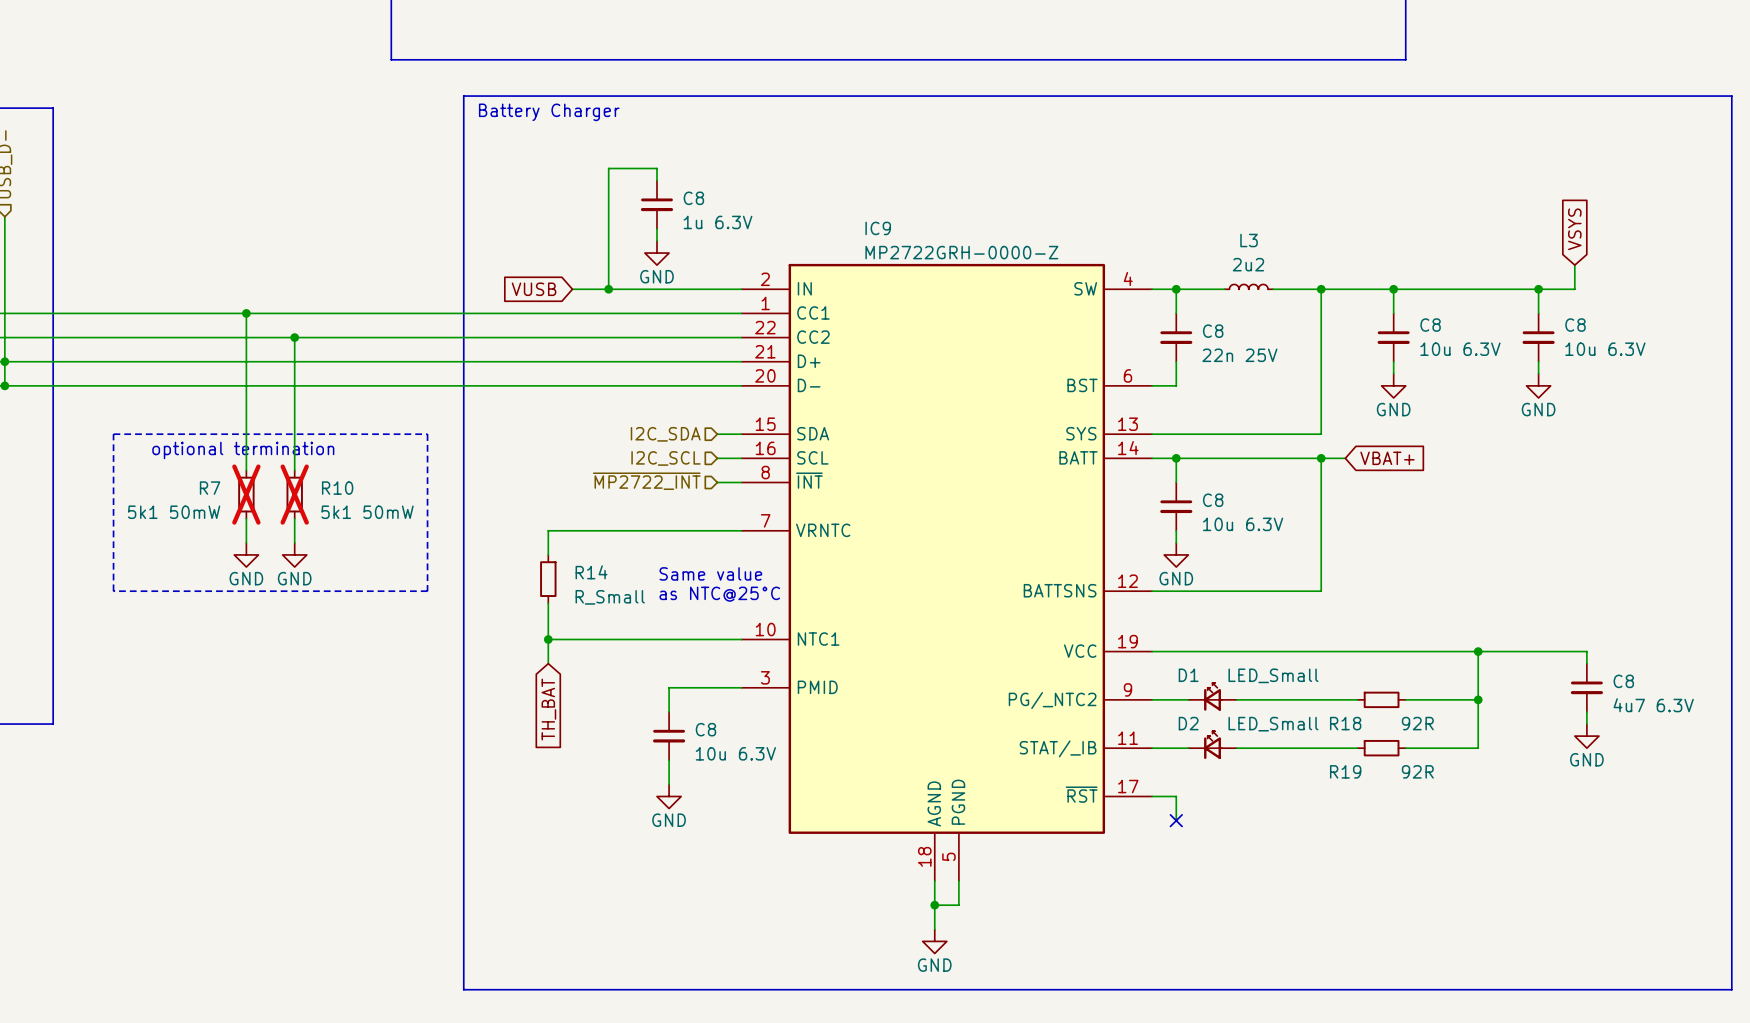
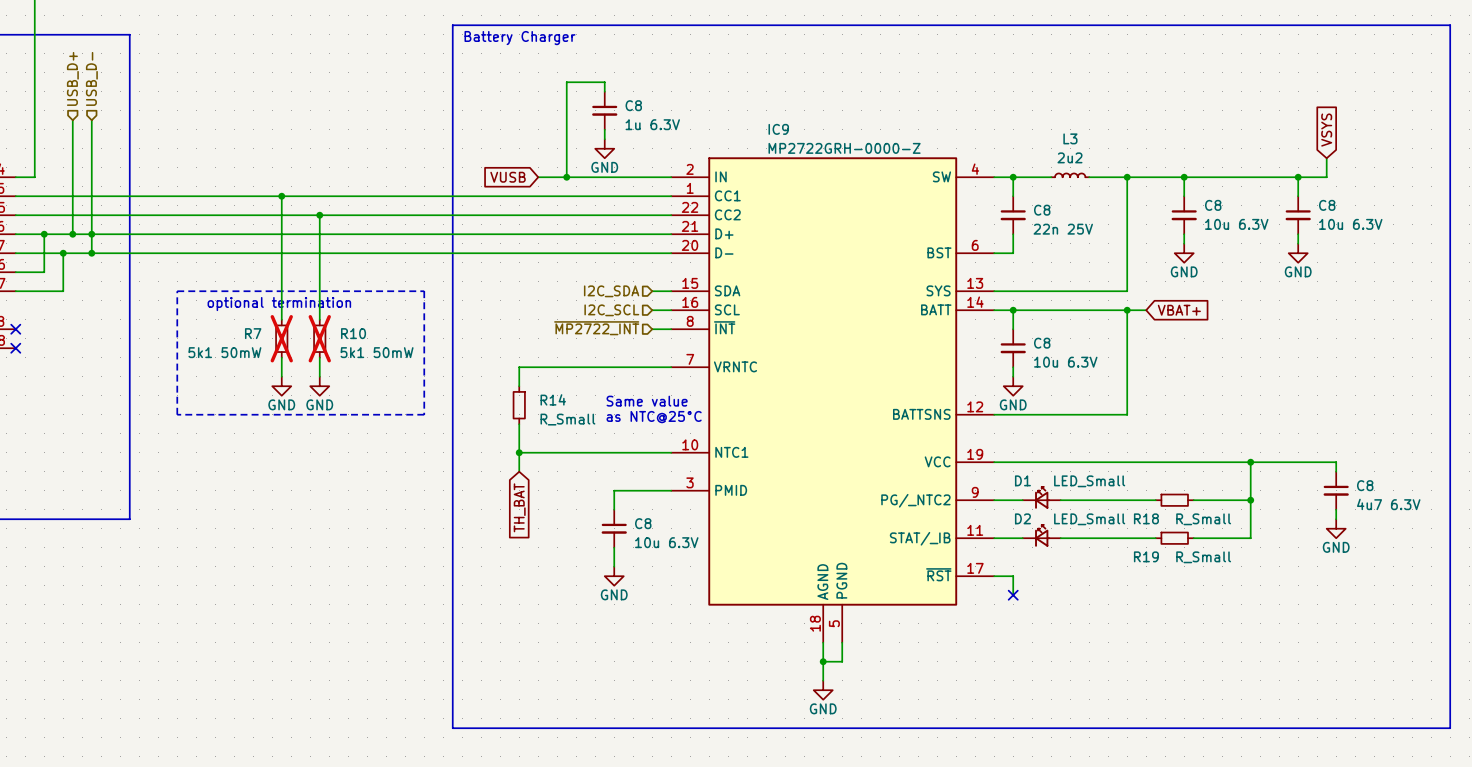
R18 value: 92R (1417, 723) -> R_Small (1203, 519)
R19 value: 92R (1417, 771) -> R_Small (1203, 557)

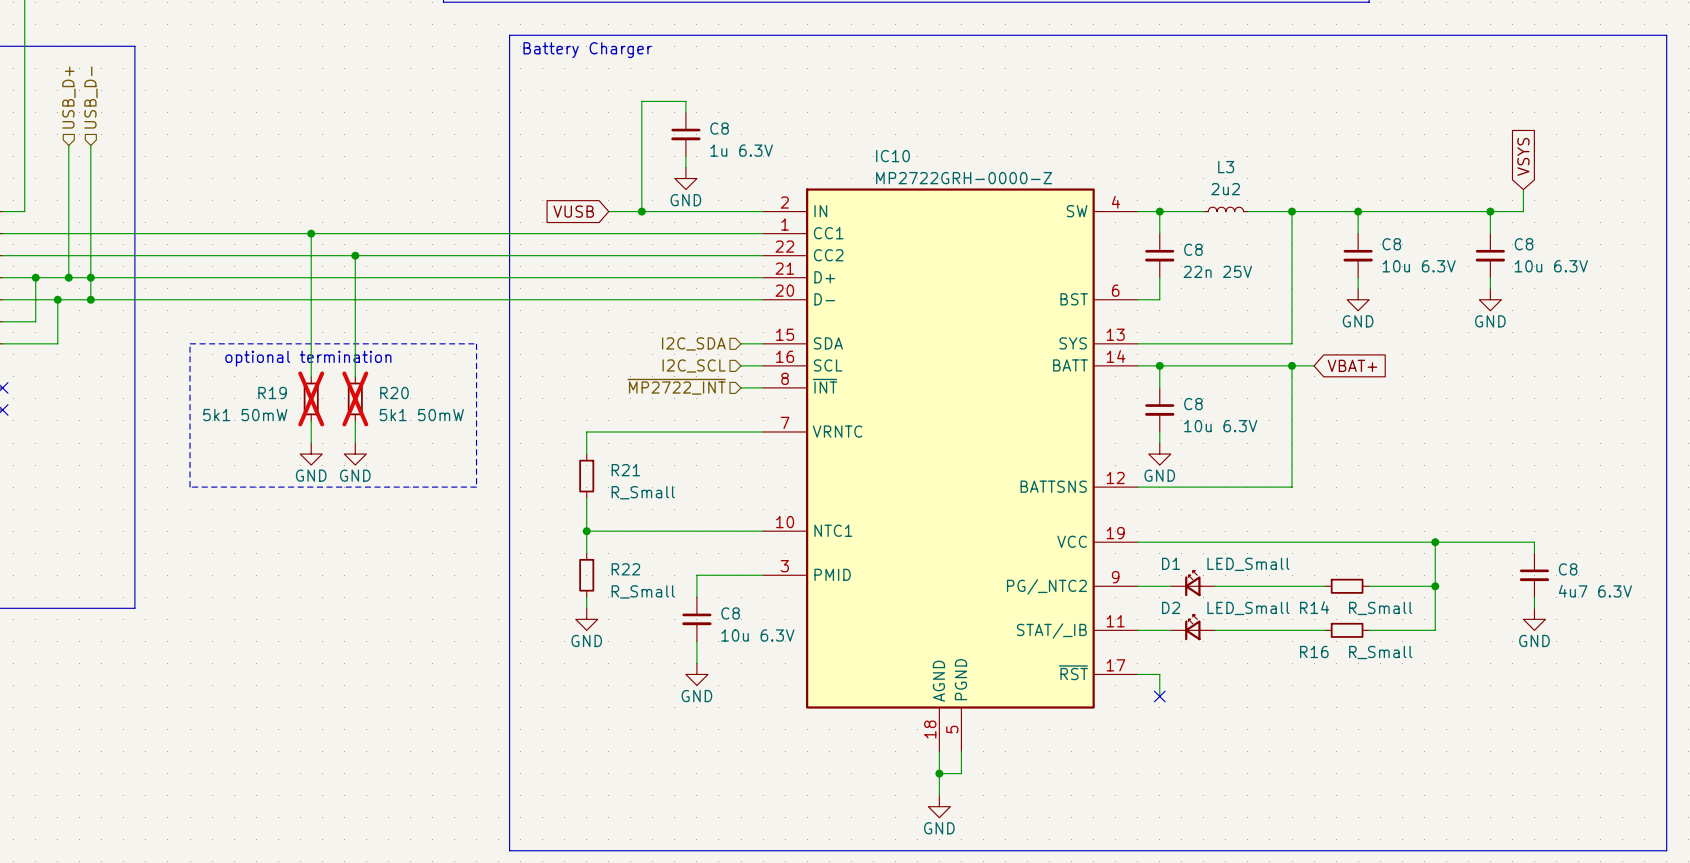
IC9 name: IC9 (778, 129) -> IC10 (893, 156)
R7 name: R7 (253, 333) -> R19 (272, 393)
R10 name: R10 (353, 333) -> R20 (394, 393)
R14 name: R14 (553, 399) -> R21 (625, 470)
text: Same value (647, 401) -> none
text: as NTC@25°C (654, 417) -> none
R22: none -> R_Small (586, 575)
global label: TH_BAT (519, 507) -> none
wire: none -> (586, 597) (586, 608)
R18 name: R18 (1146, 518) -> R14 (1314, 607)
power symbol: none -> GND (586, 619)
R19 name: R19 (1146, 556) -> R16 (1314, 651)

